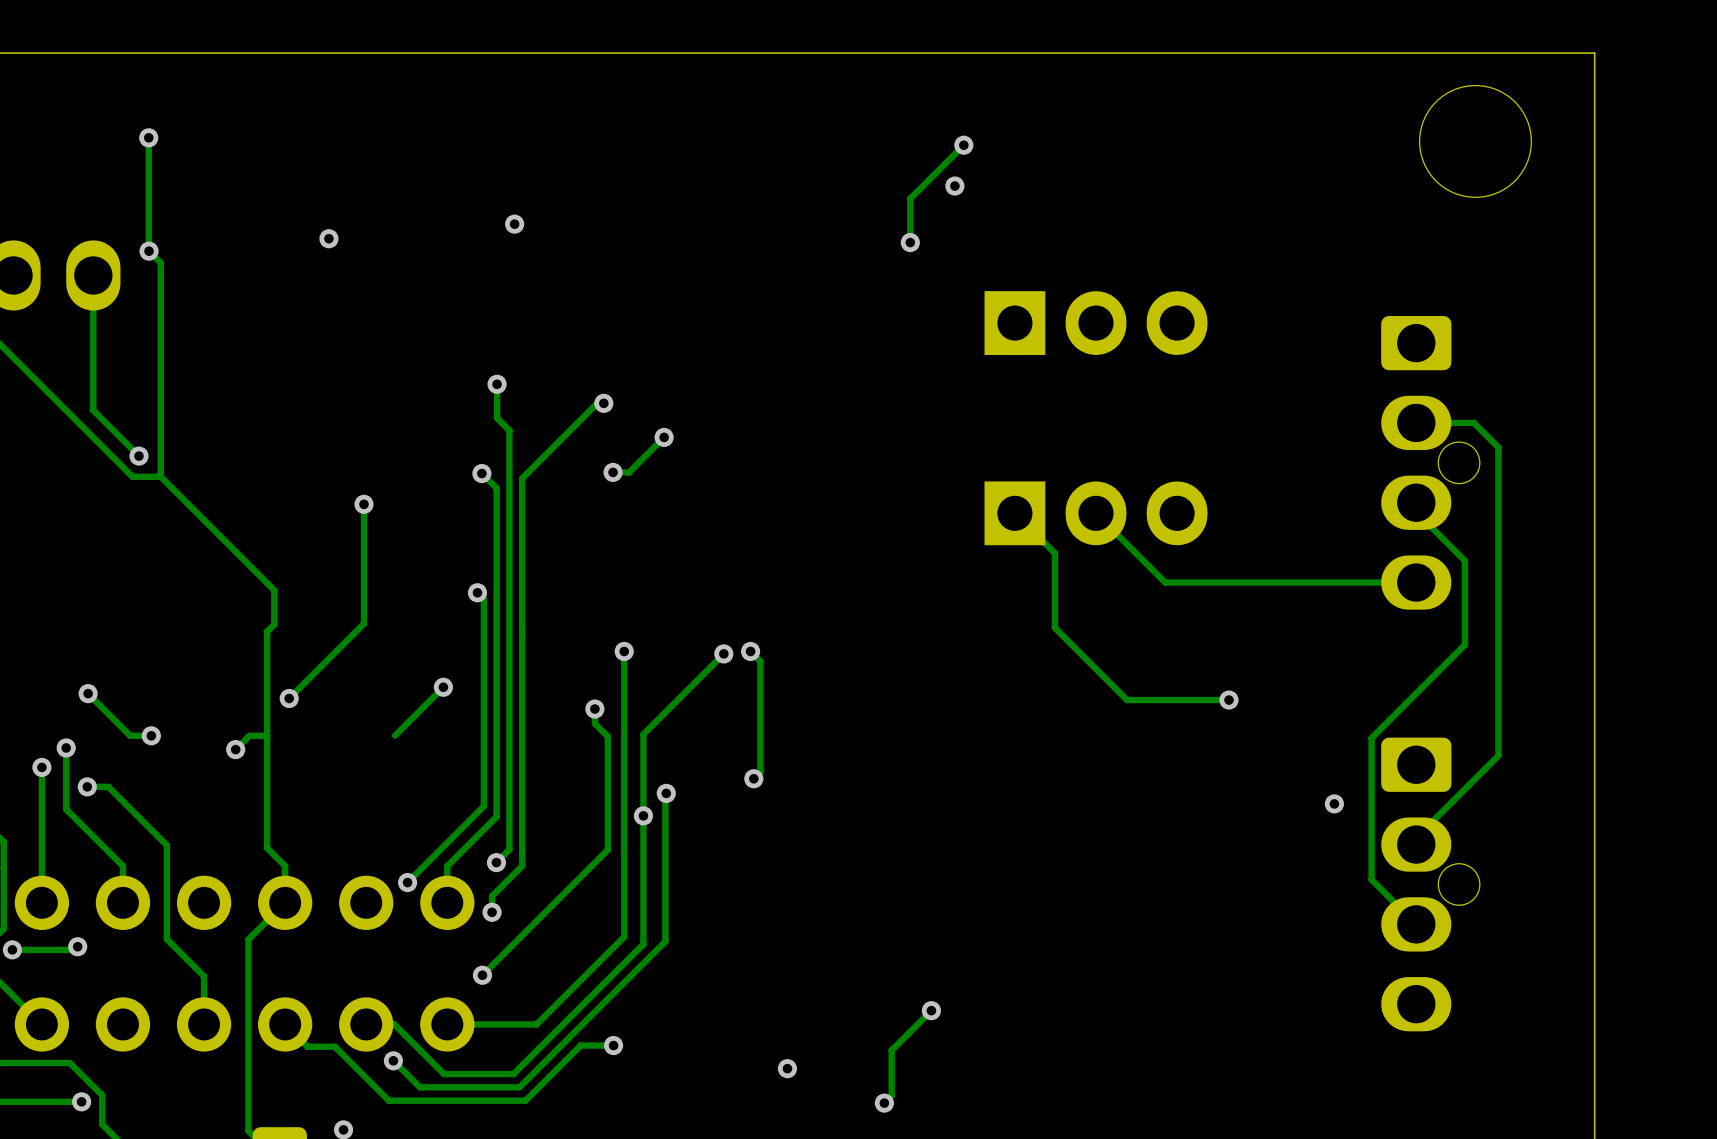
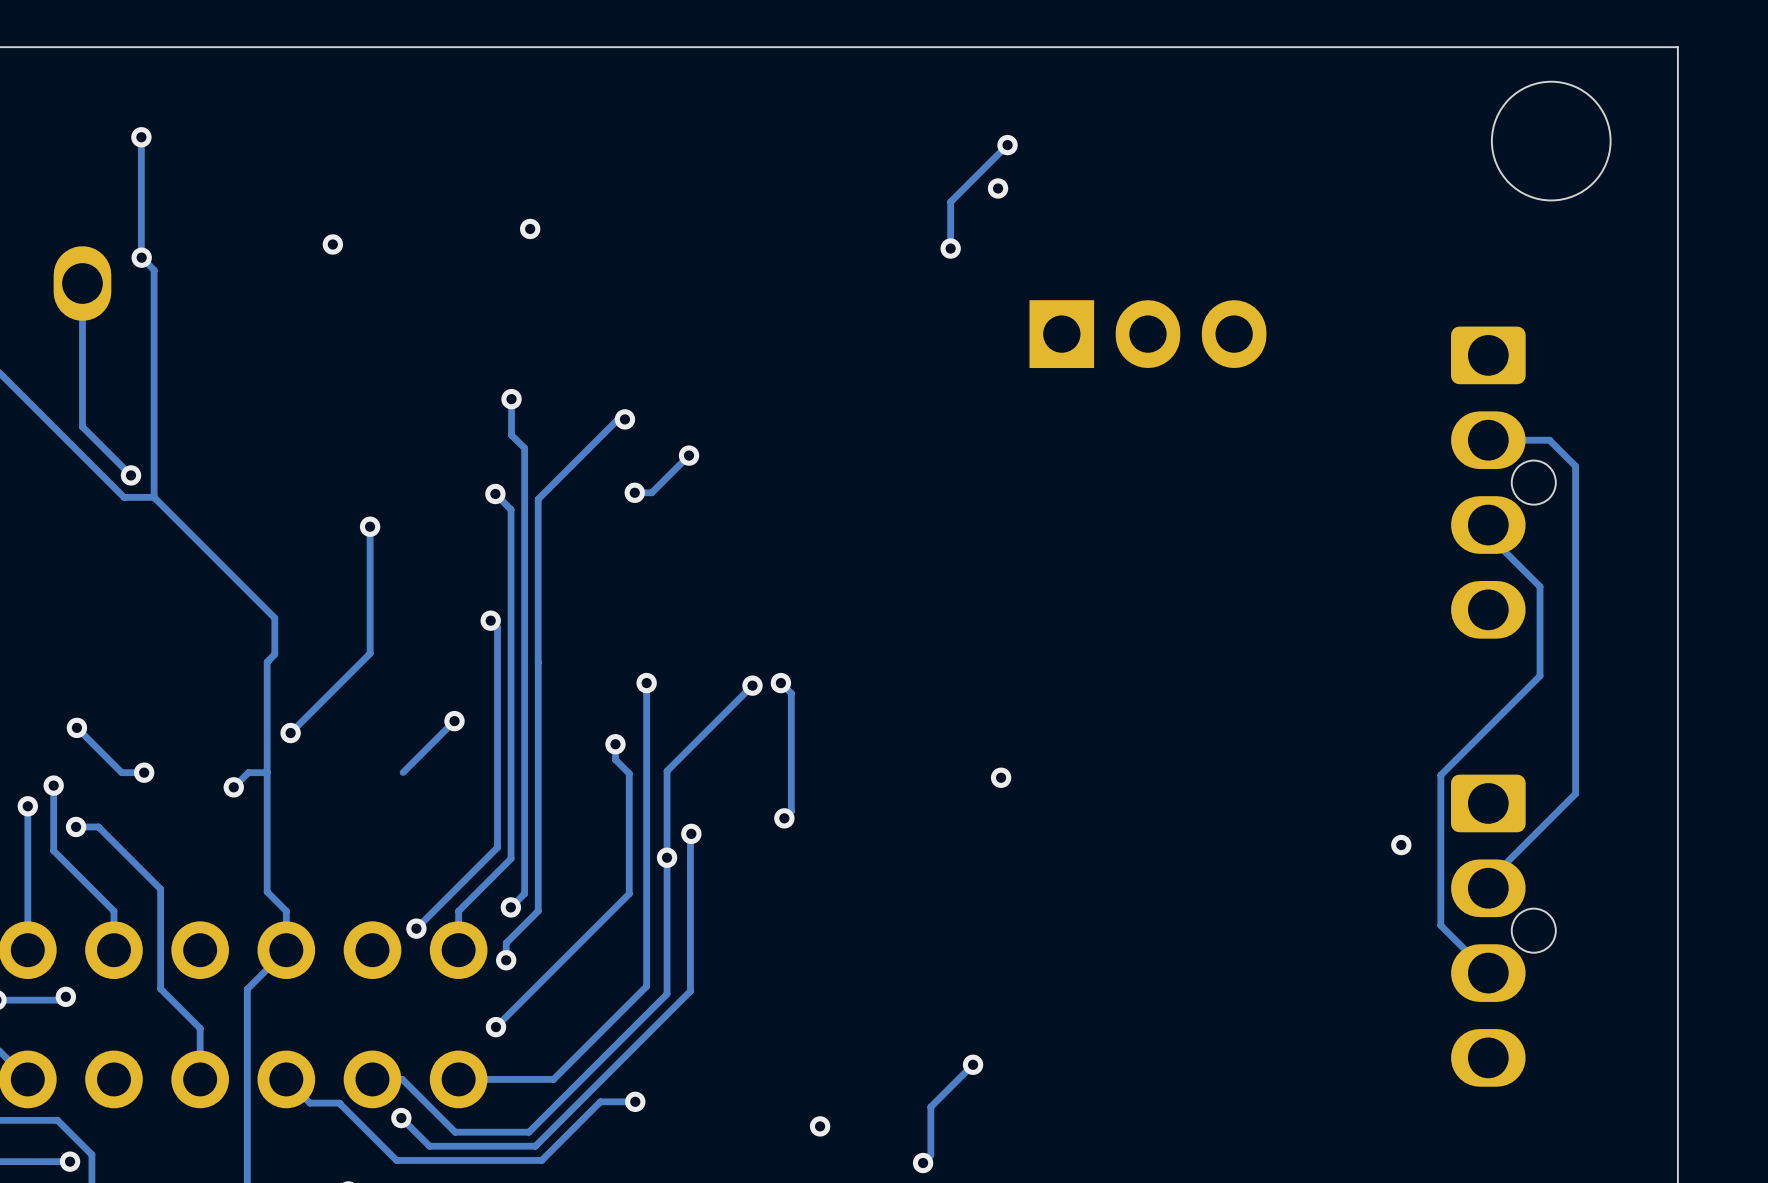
track: (1014, 513) (1054, 553) (1054, 627) (1127, 700) (1228, 700) -> none
track: (1096, 513) (1165, 582) (1416, 582) -> none
part: (1096, 513) -> none
via: (1228, 700) -> none
via: none -> (1001, 777)

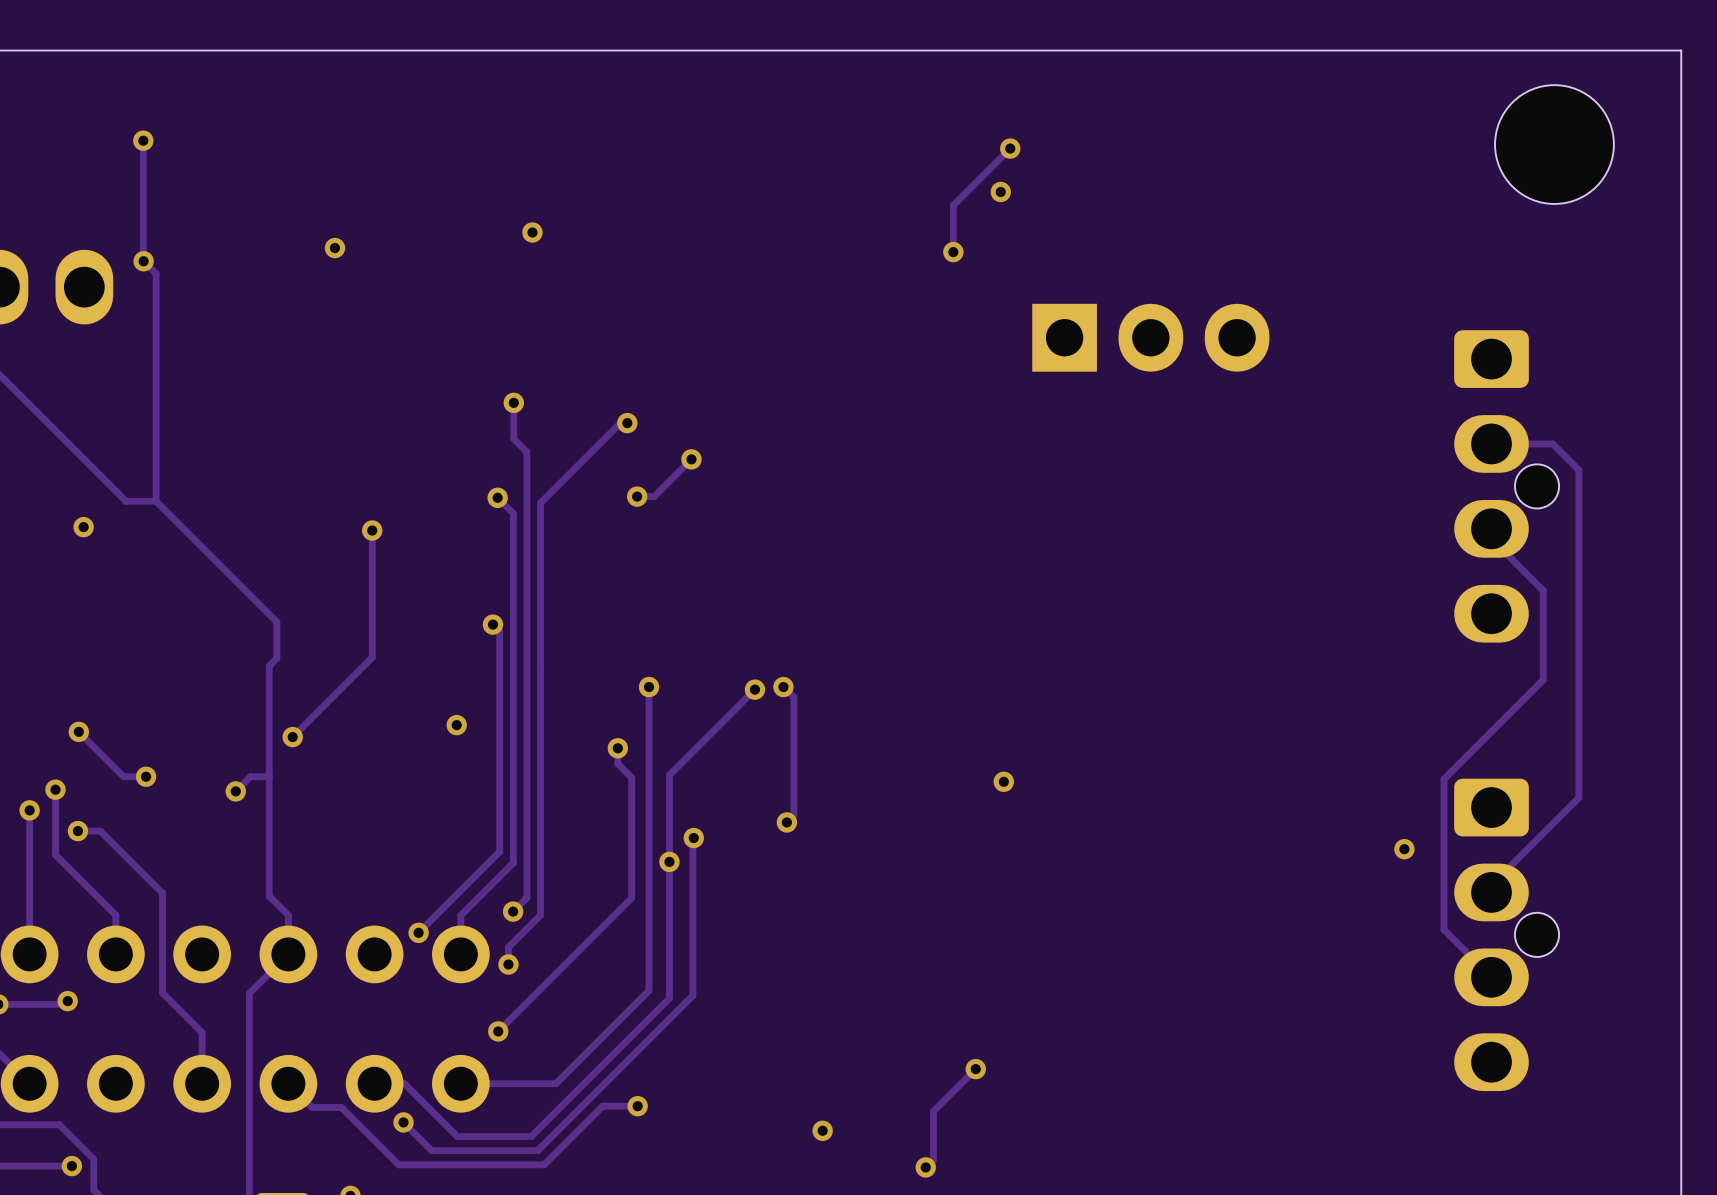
track: (82, 283) (82, 426) (131, 475) -> none
via position: (131, 475) -> (83, 527)
track: (454, 721) (403, 772) -> none

